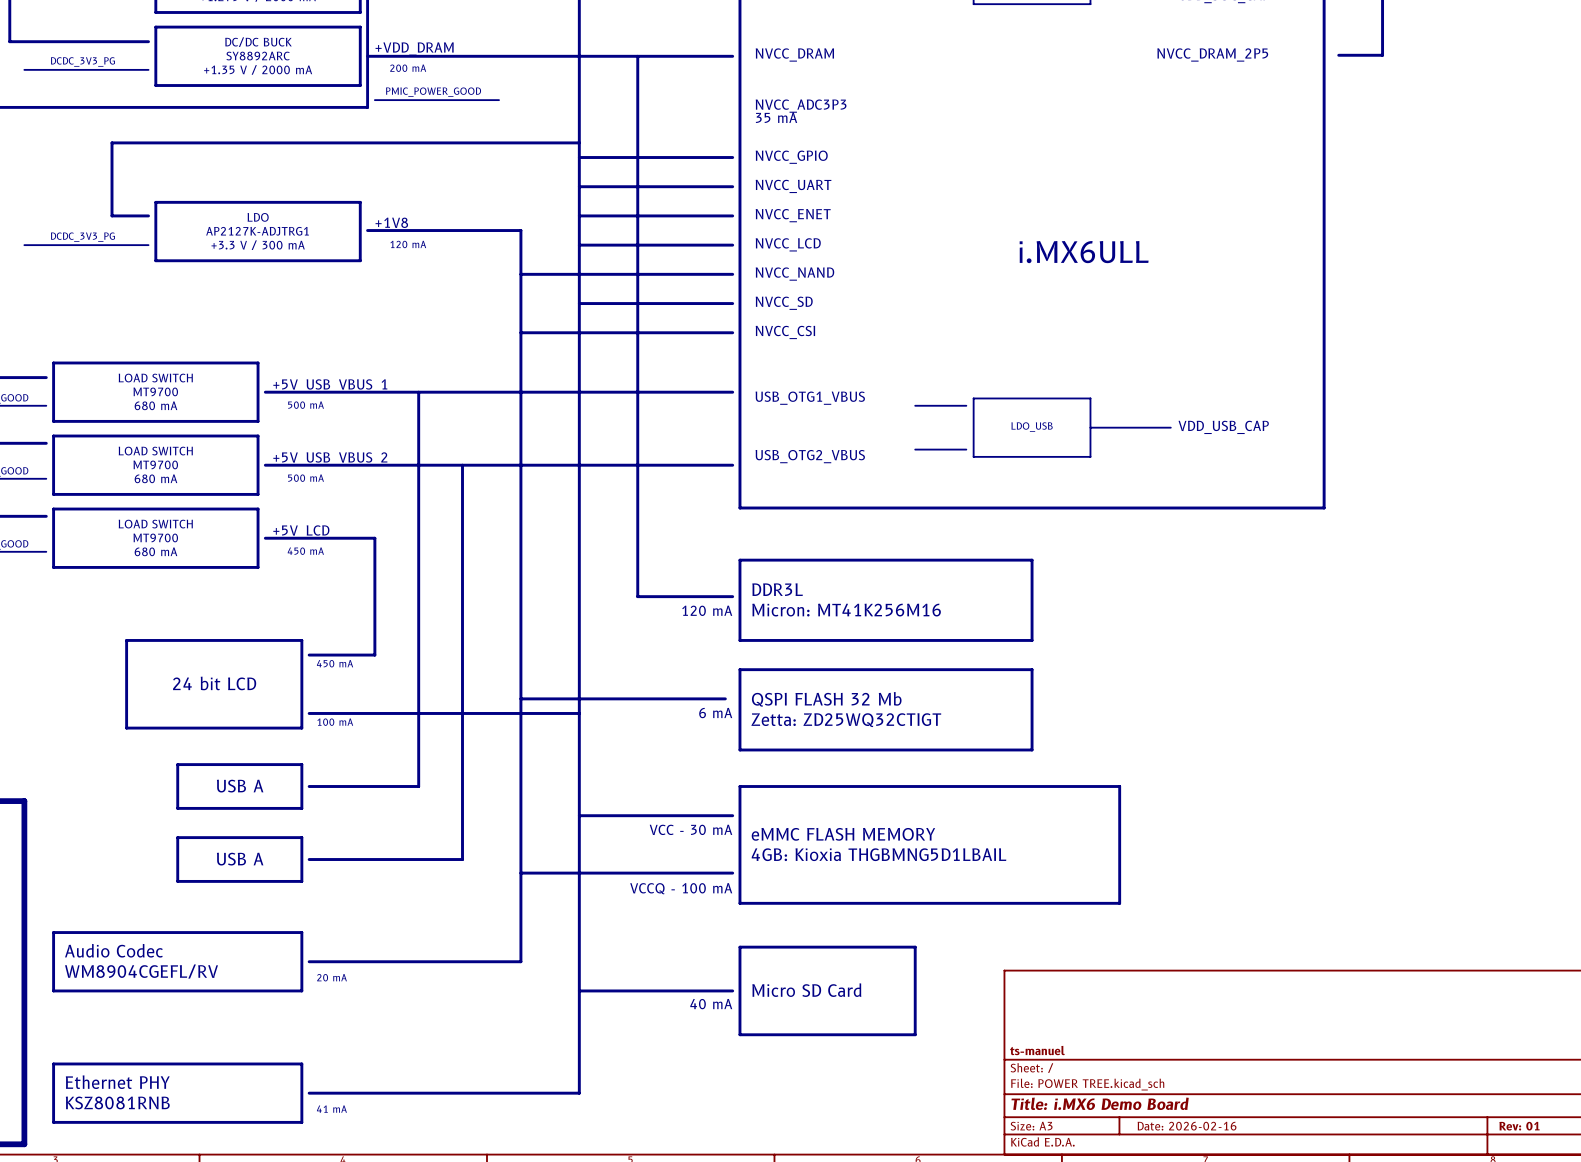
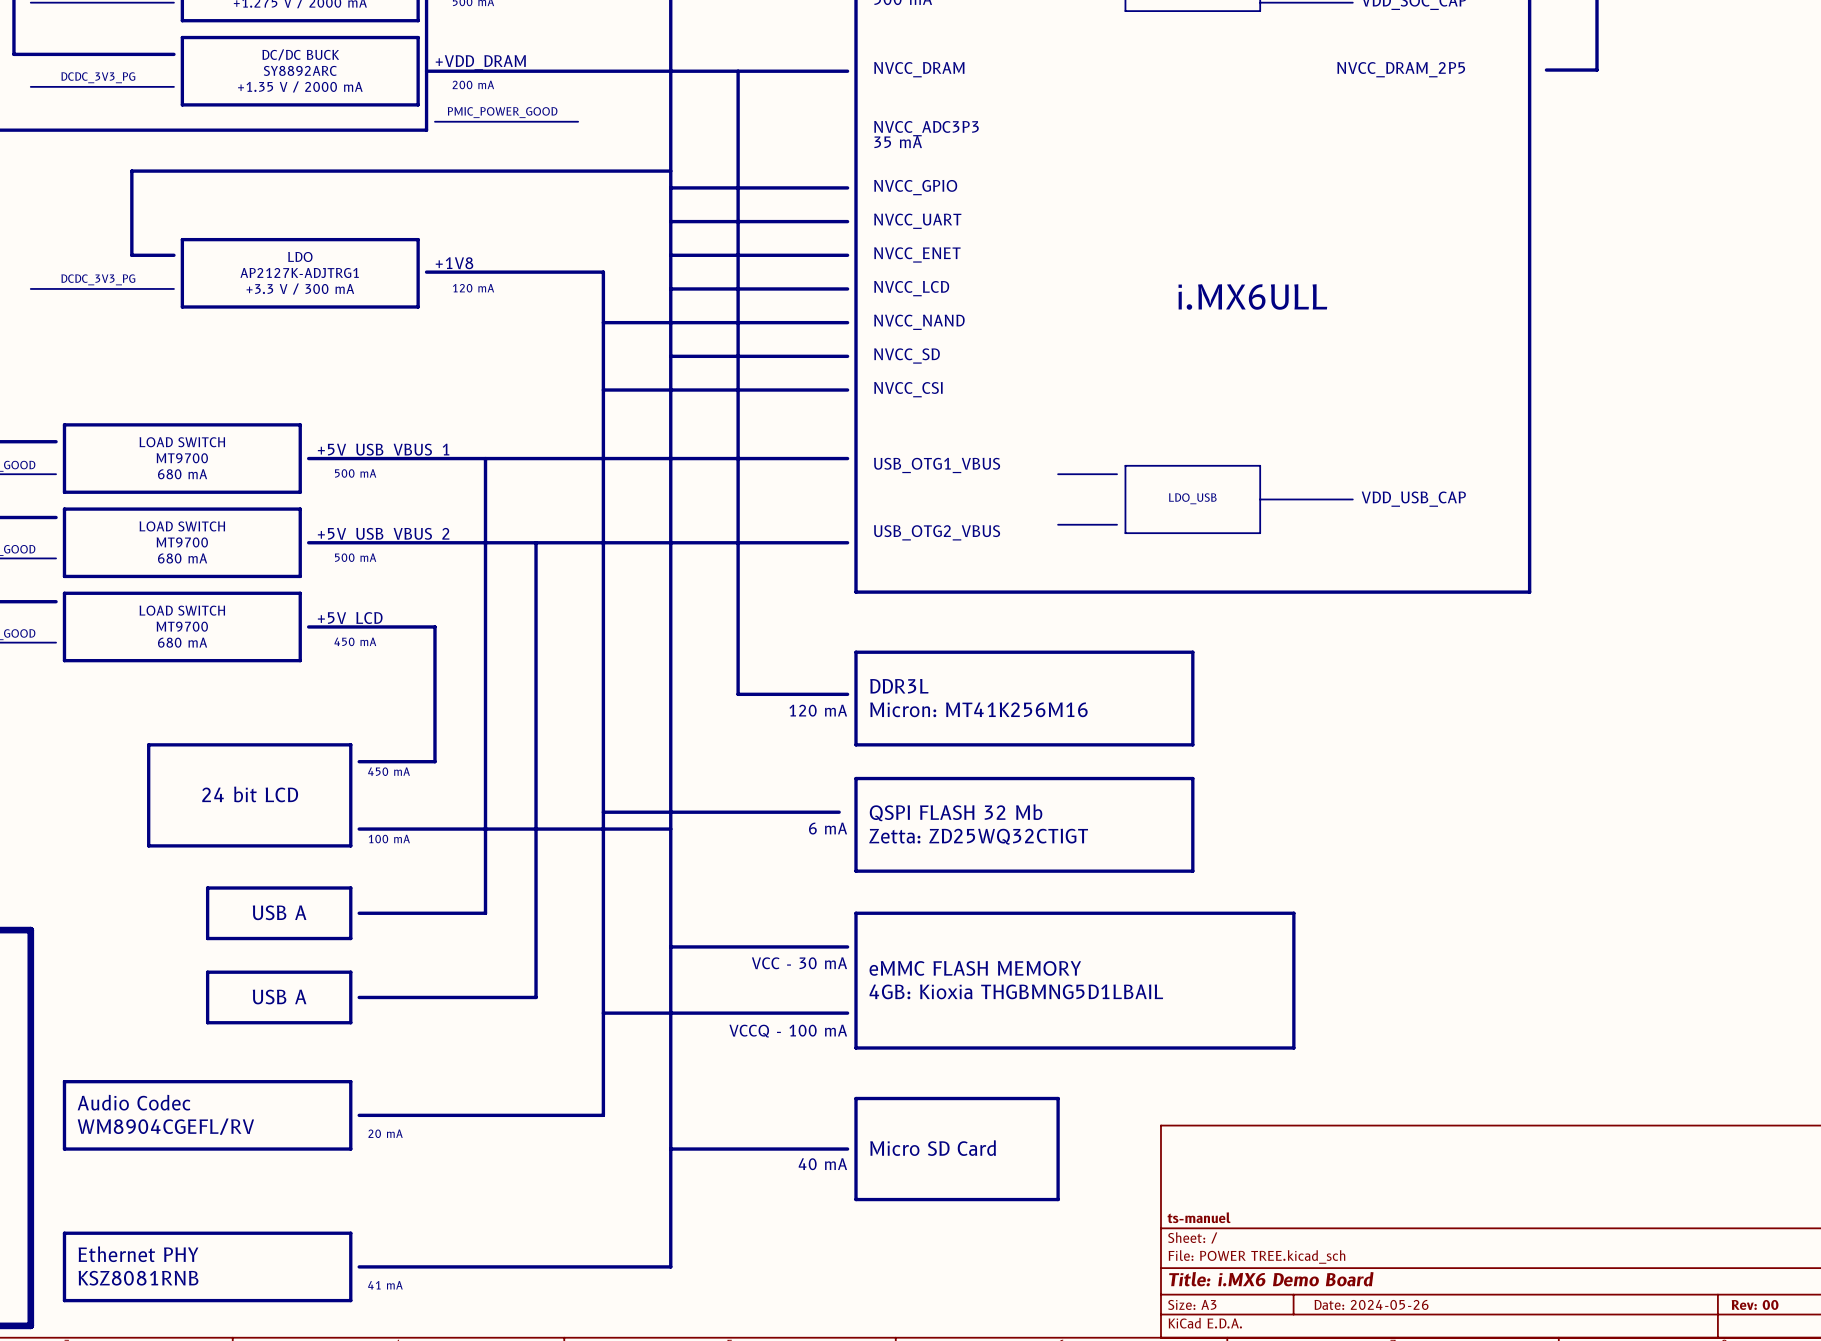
title block: Date: 2026-02-16 (1187, 1126) -> Date: 2024-05-26 (1371, 1304)
title block: Rev: 01 (1519, 1126) -> Rev: 00 (1755, 1304)

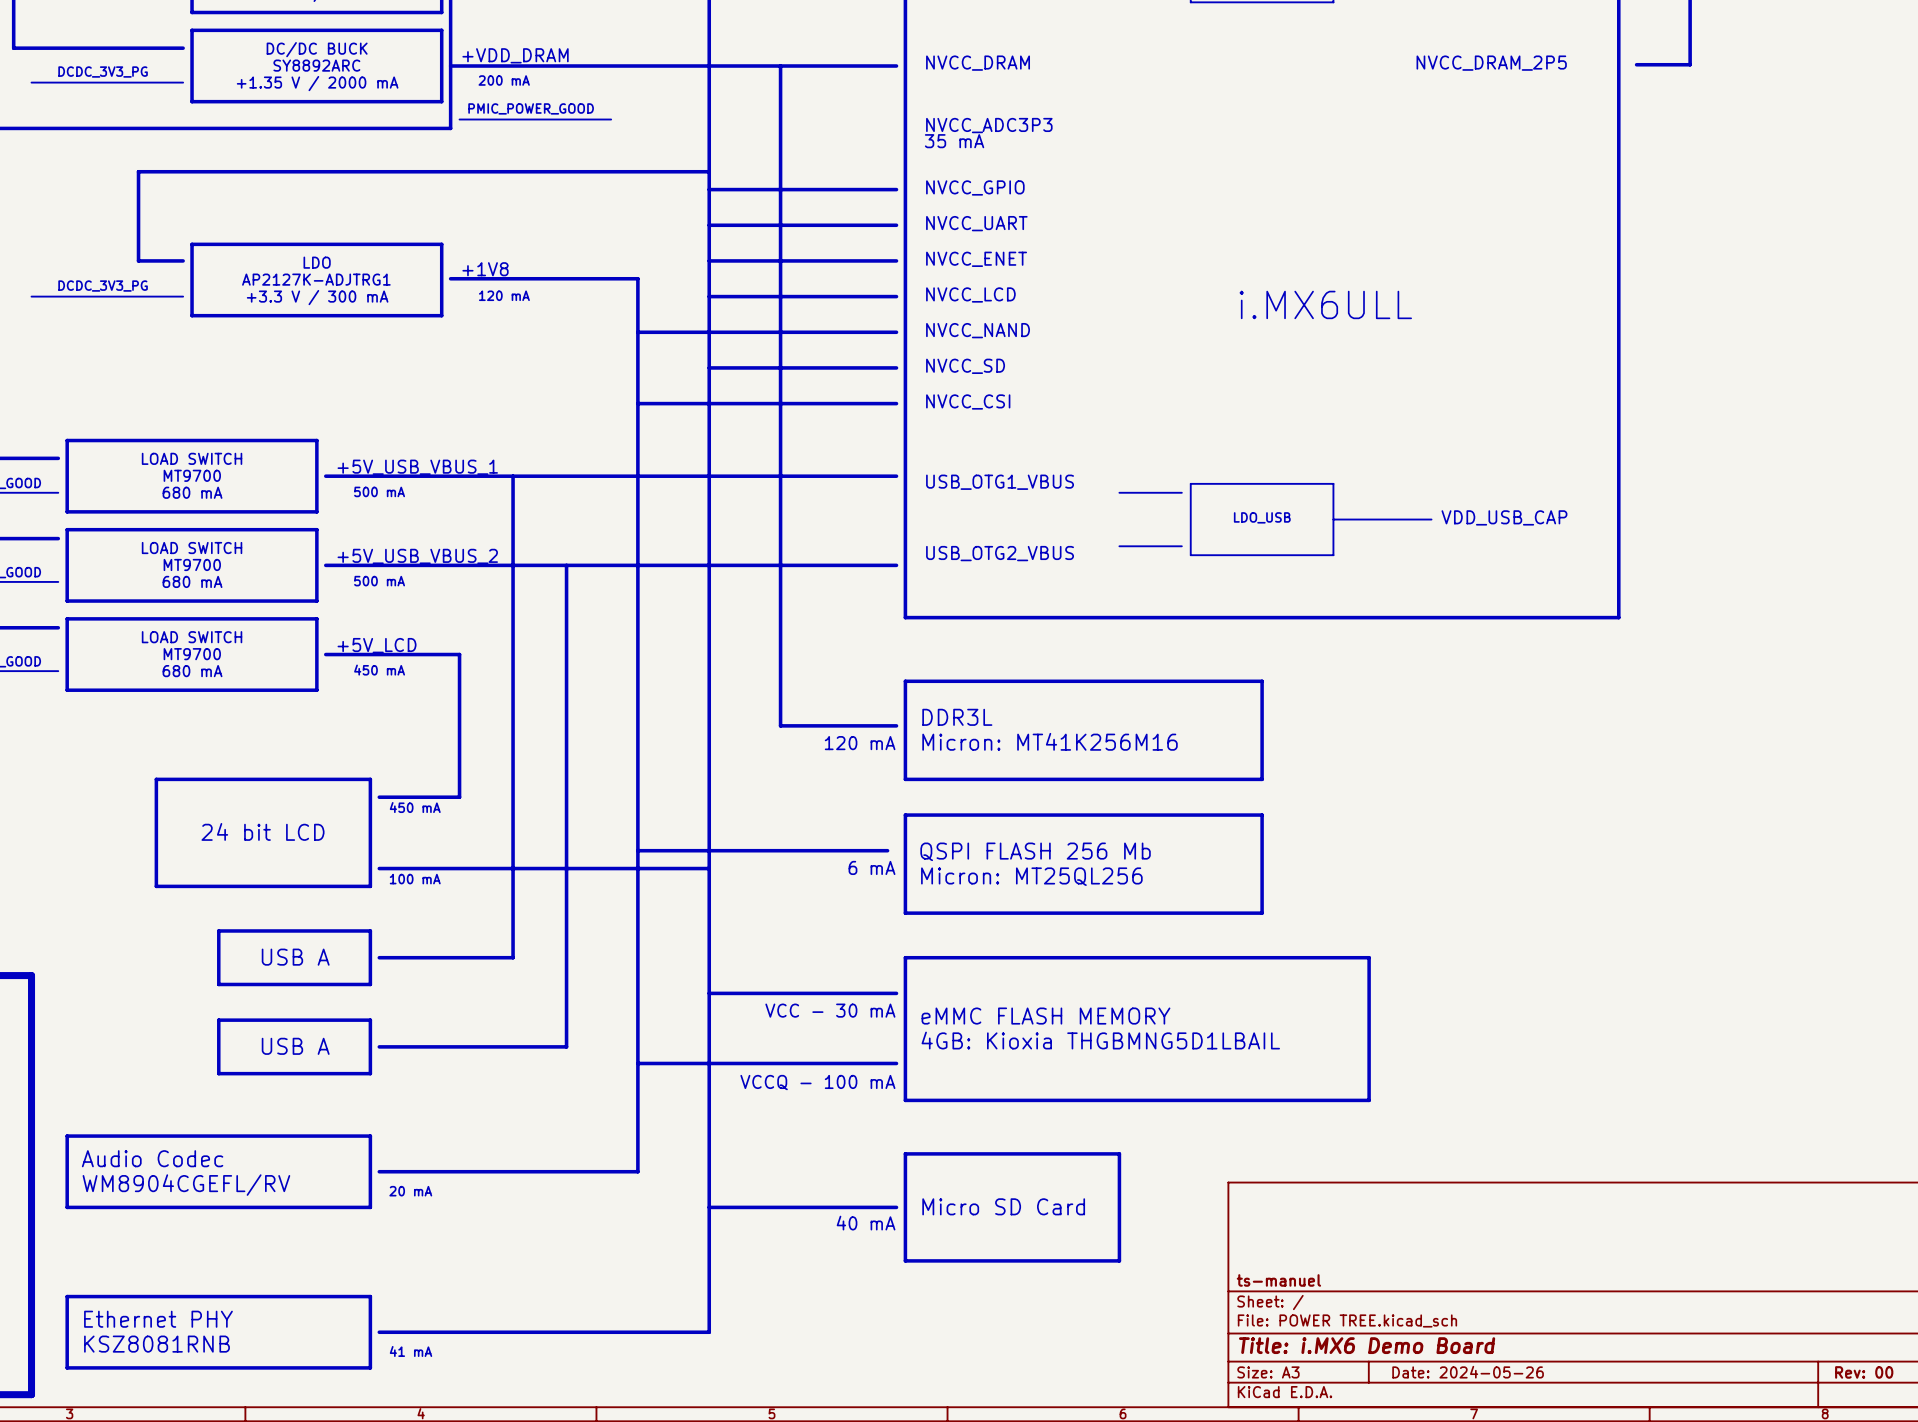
text: QSPI FLASH 32 Mb (956, 812) -> QSPI FLASH 256 Mb (1035, 851)
text: Zetta: ZD25WQ32CTIGT (978, 836) -> Micron: MT25QL256 (1031, 876)

